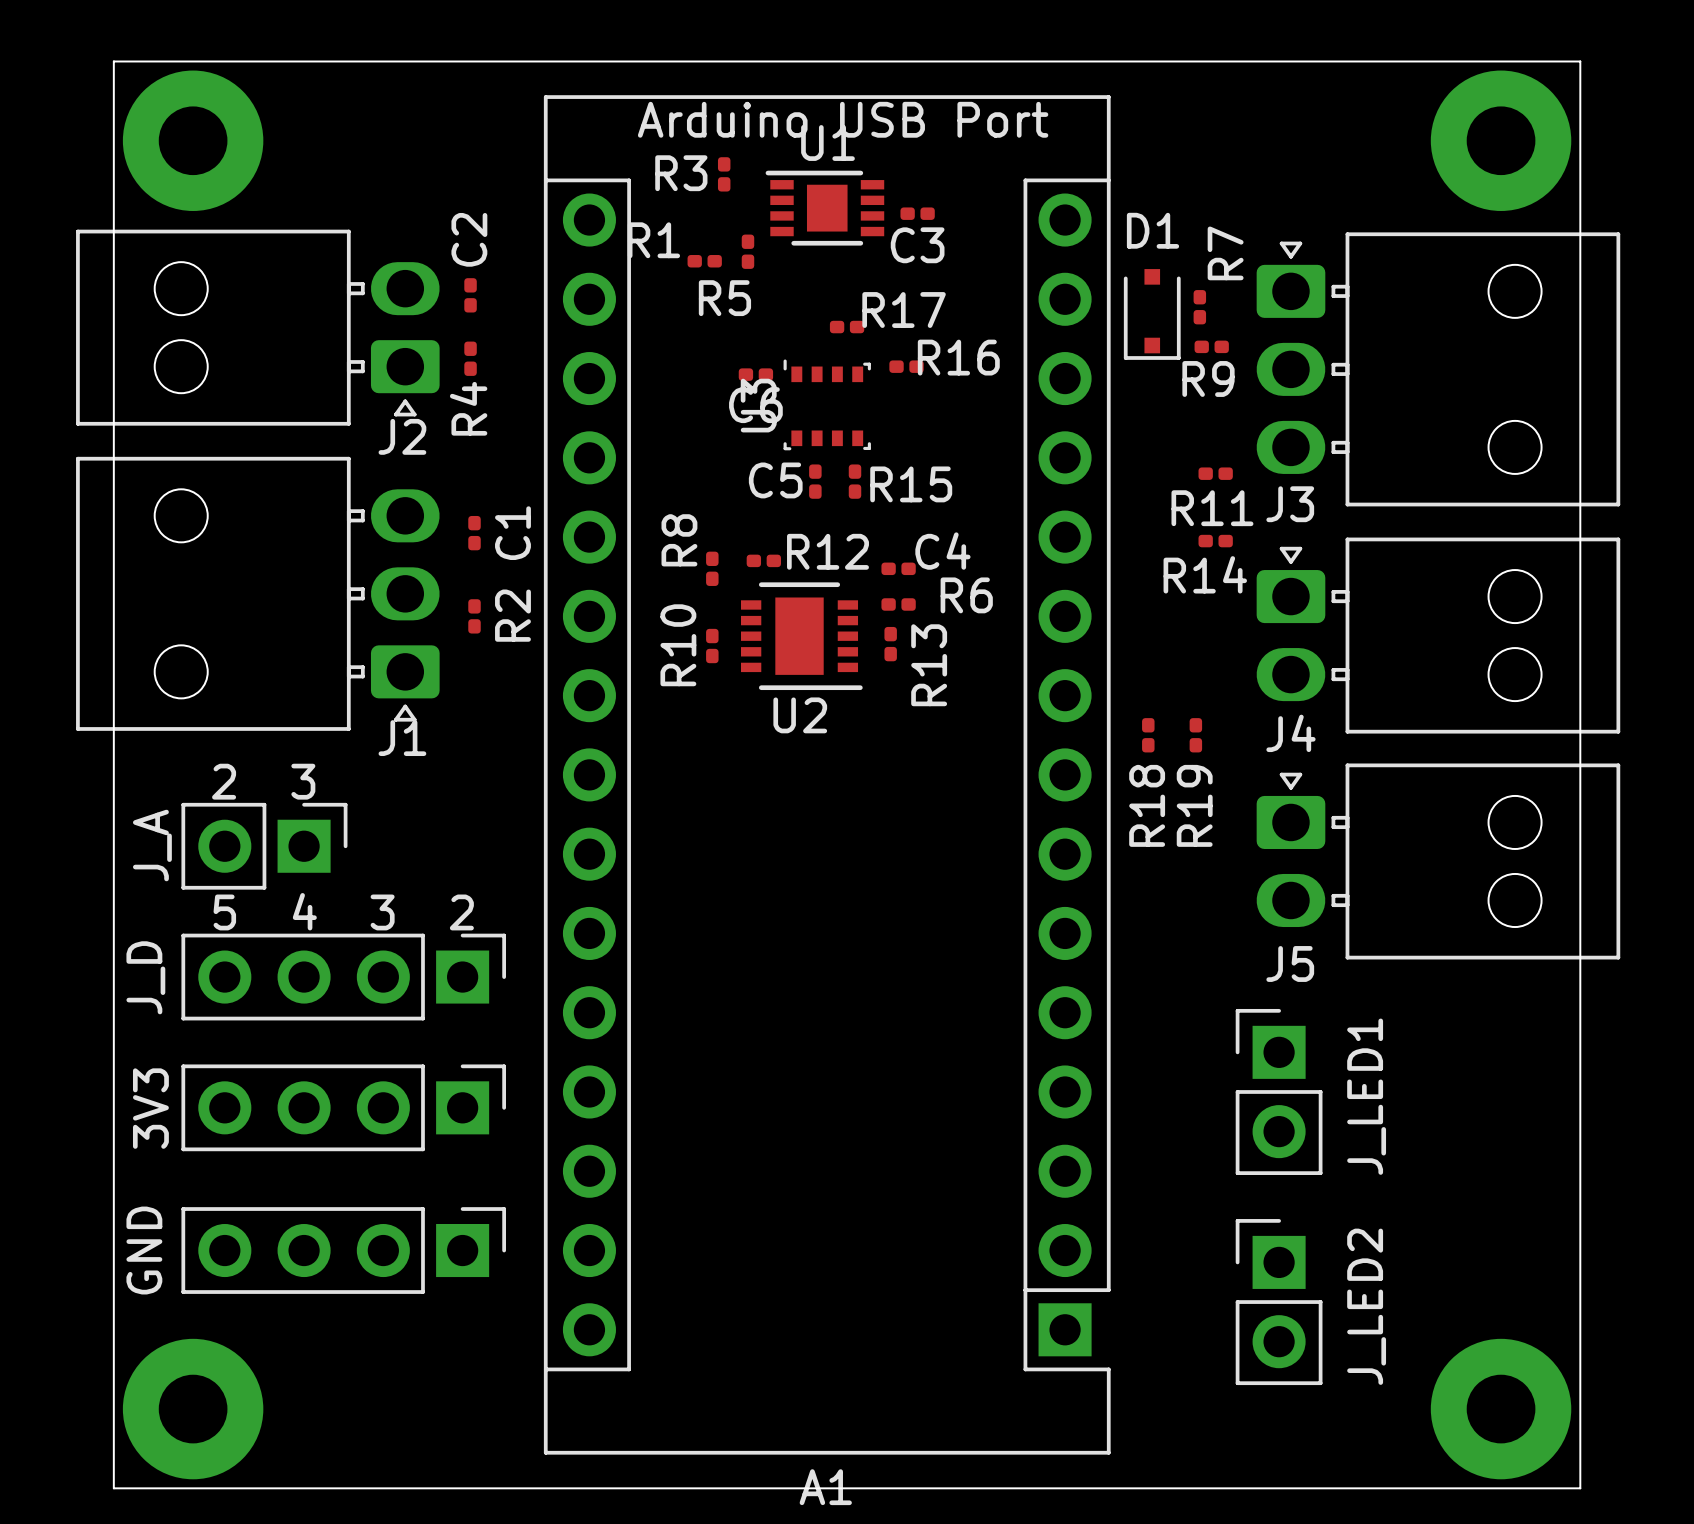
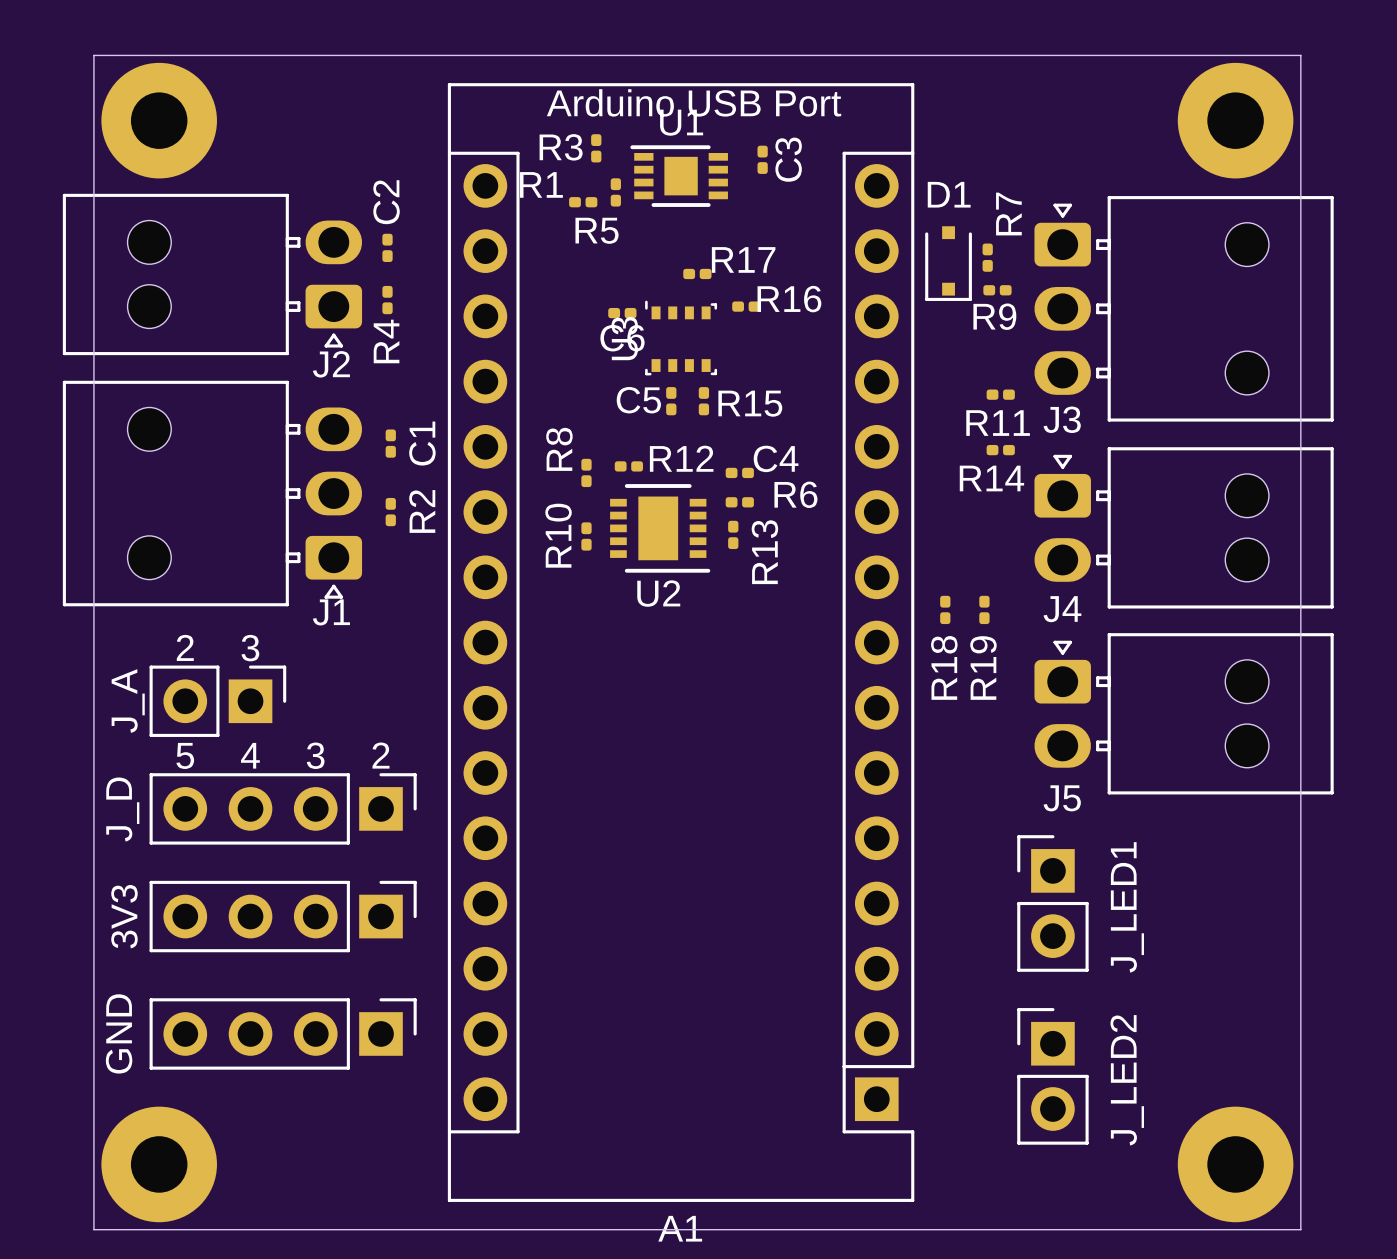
C3 rotation: 0° (917, 213) -> 90° clockwise (762, 159)
C3 position: (917, 213) -> (762, 159)
R5 position: (747, 251) -> (615, 192)
R1 position: (704, 261) -> (583, 202)

